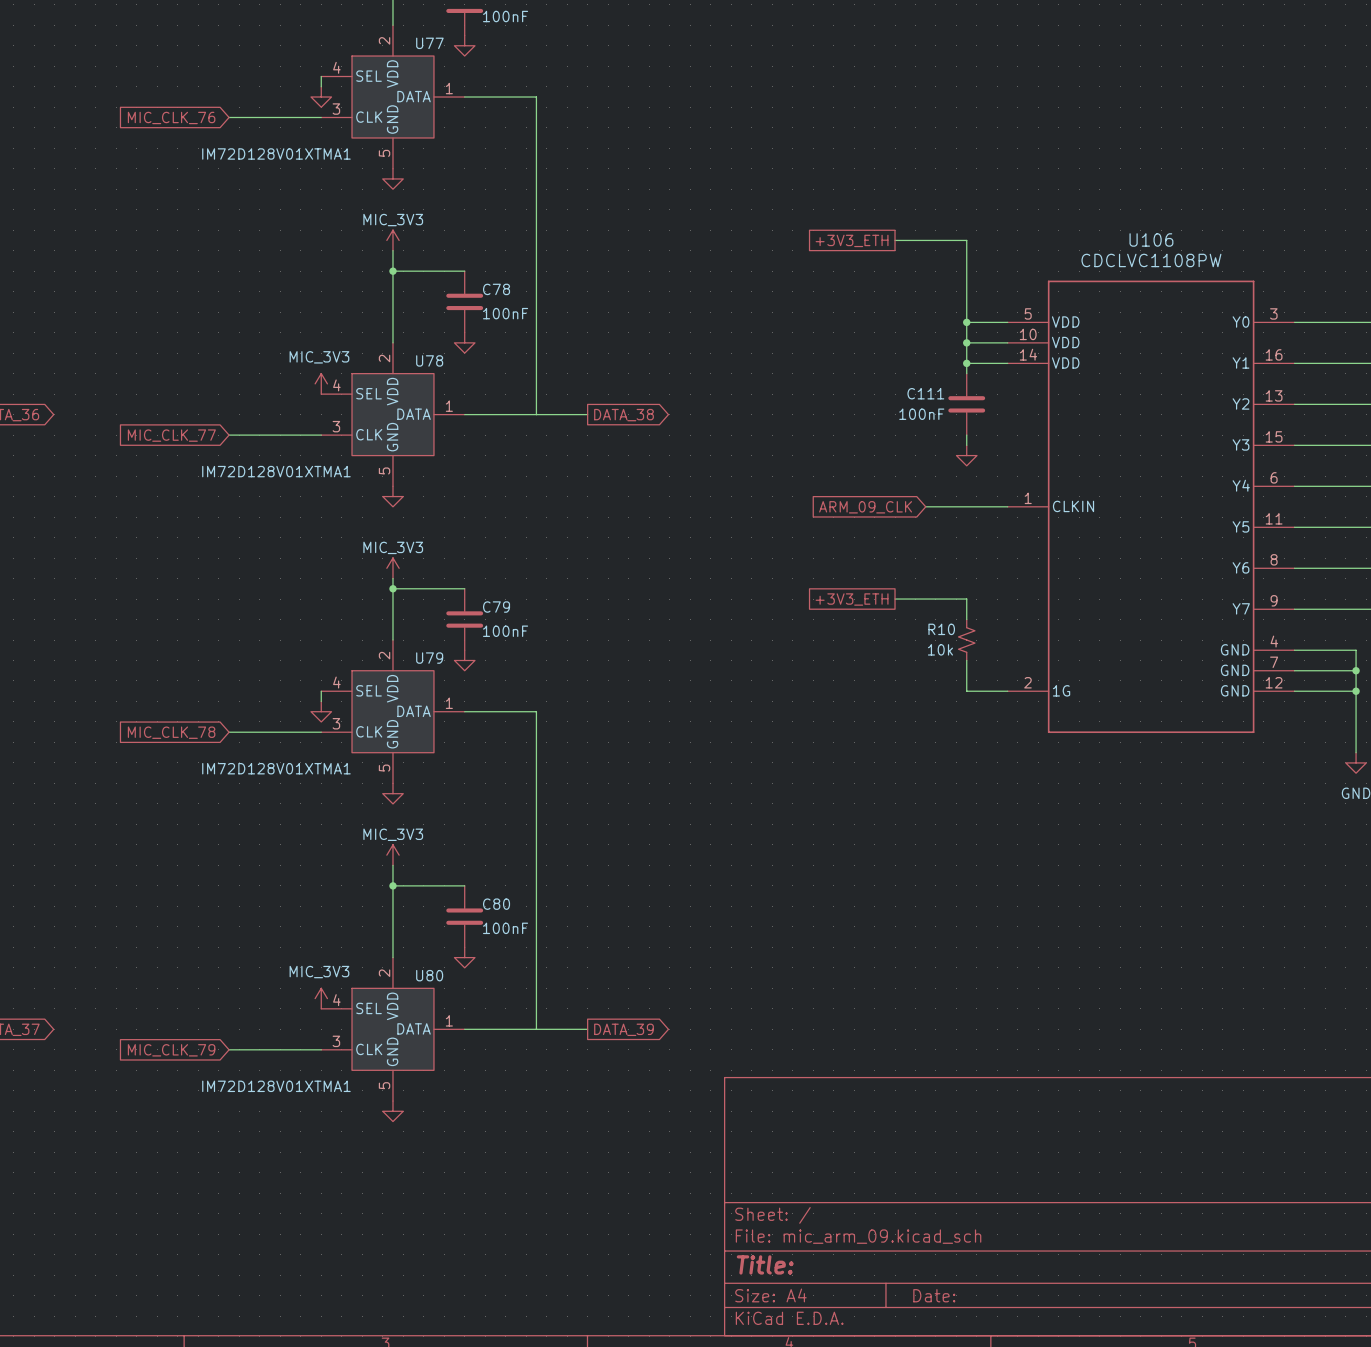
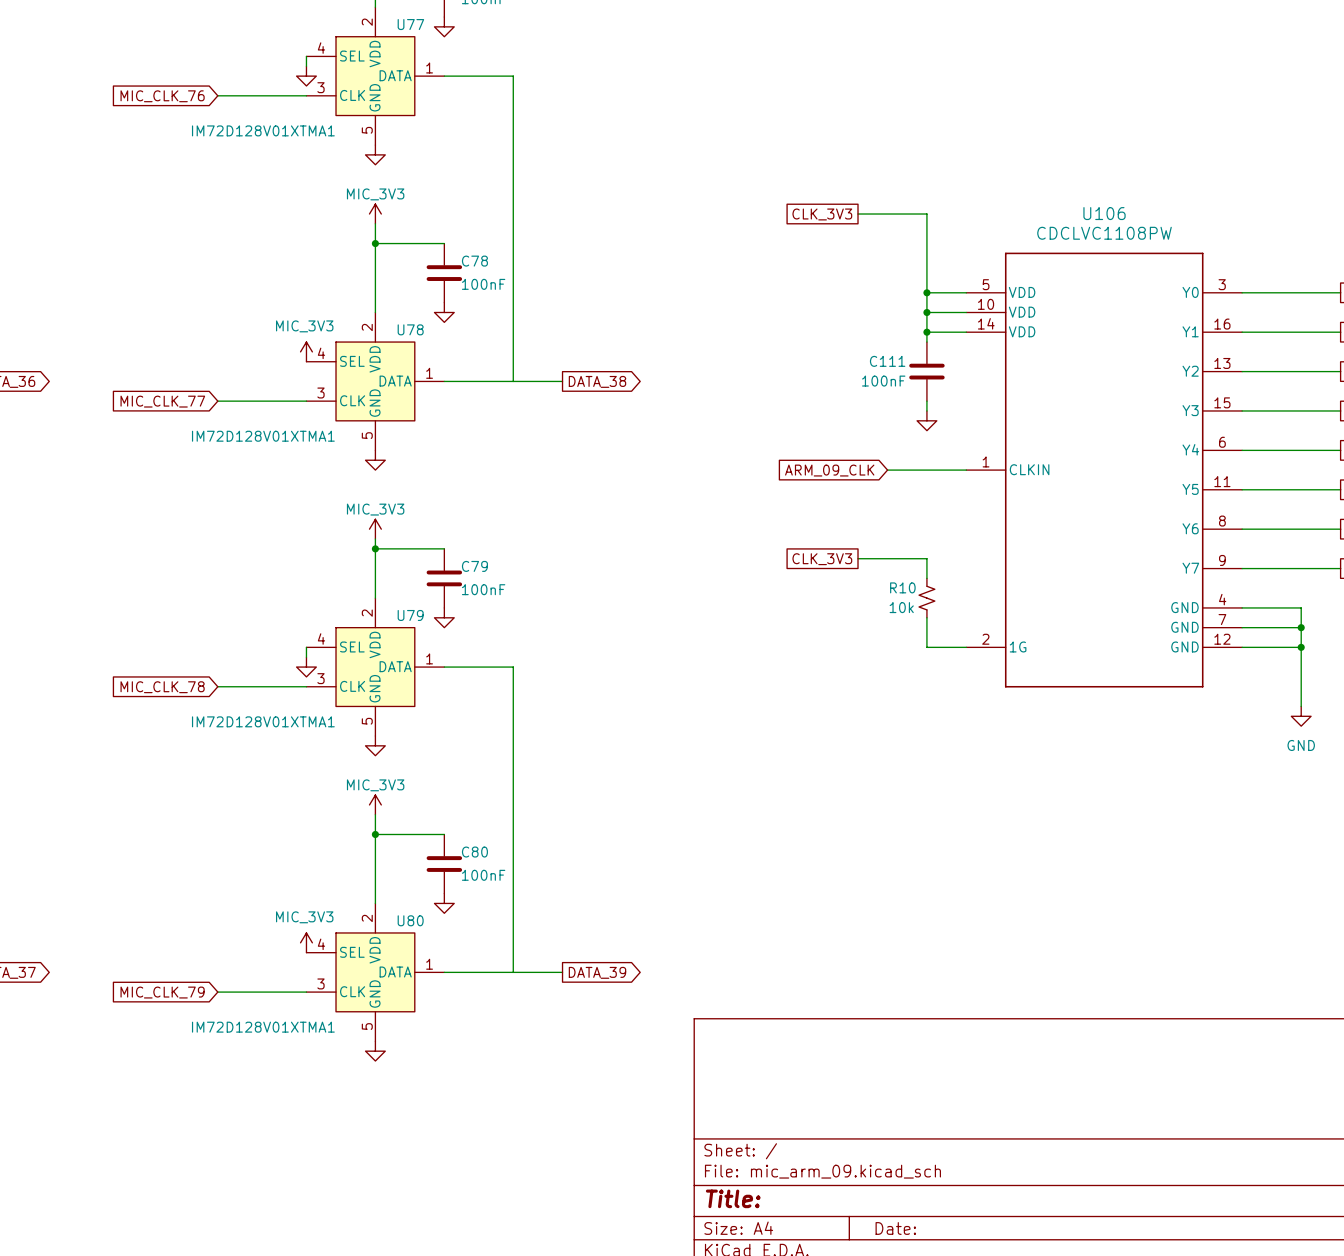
global label: +3V3_ETH (852, 240) -> CLK_3V3 (822, 214)
global label: +3V3_ETH (852, 599) -> CLK_3V3 (822, 559)

